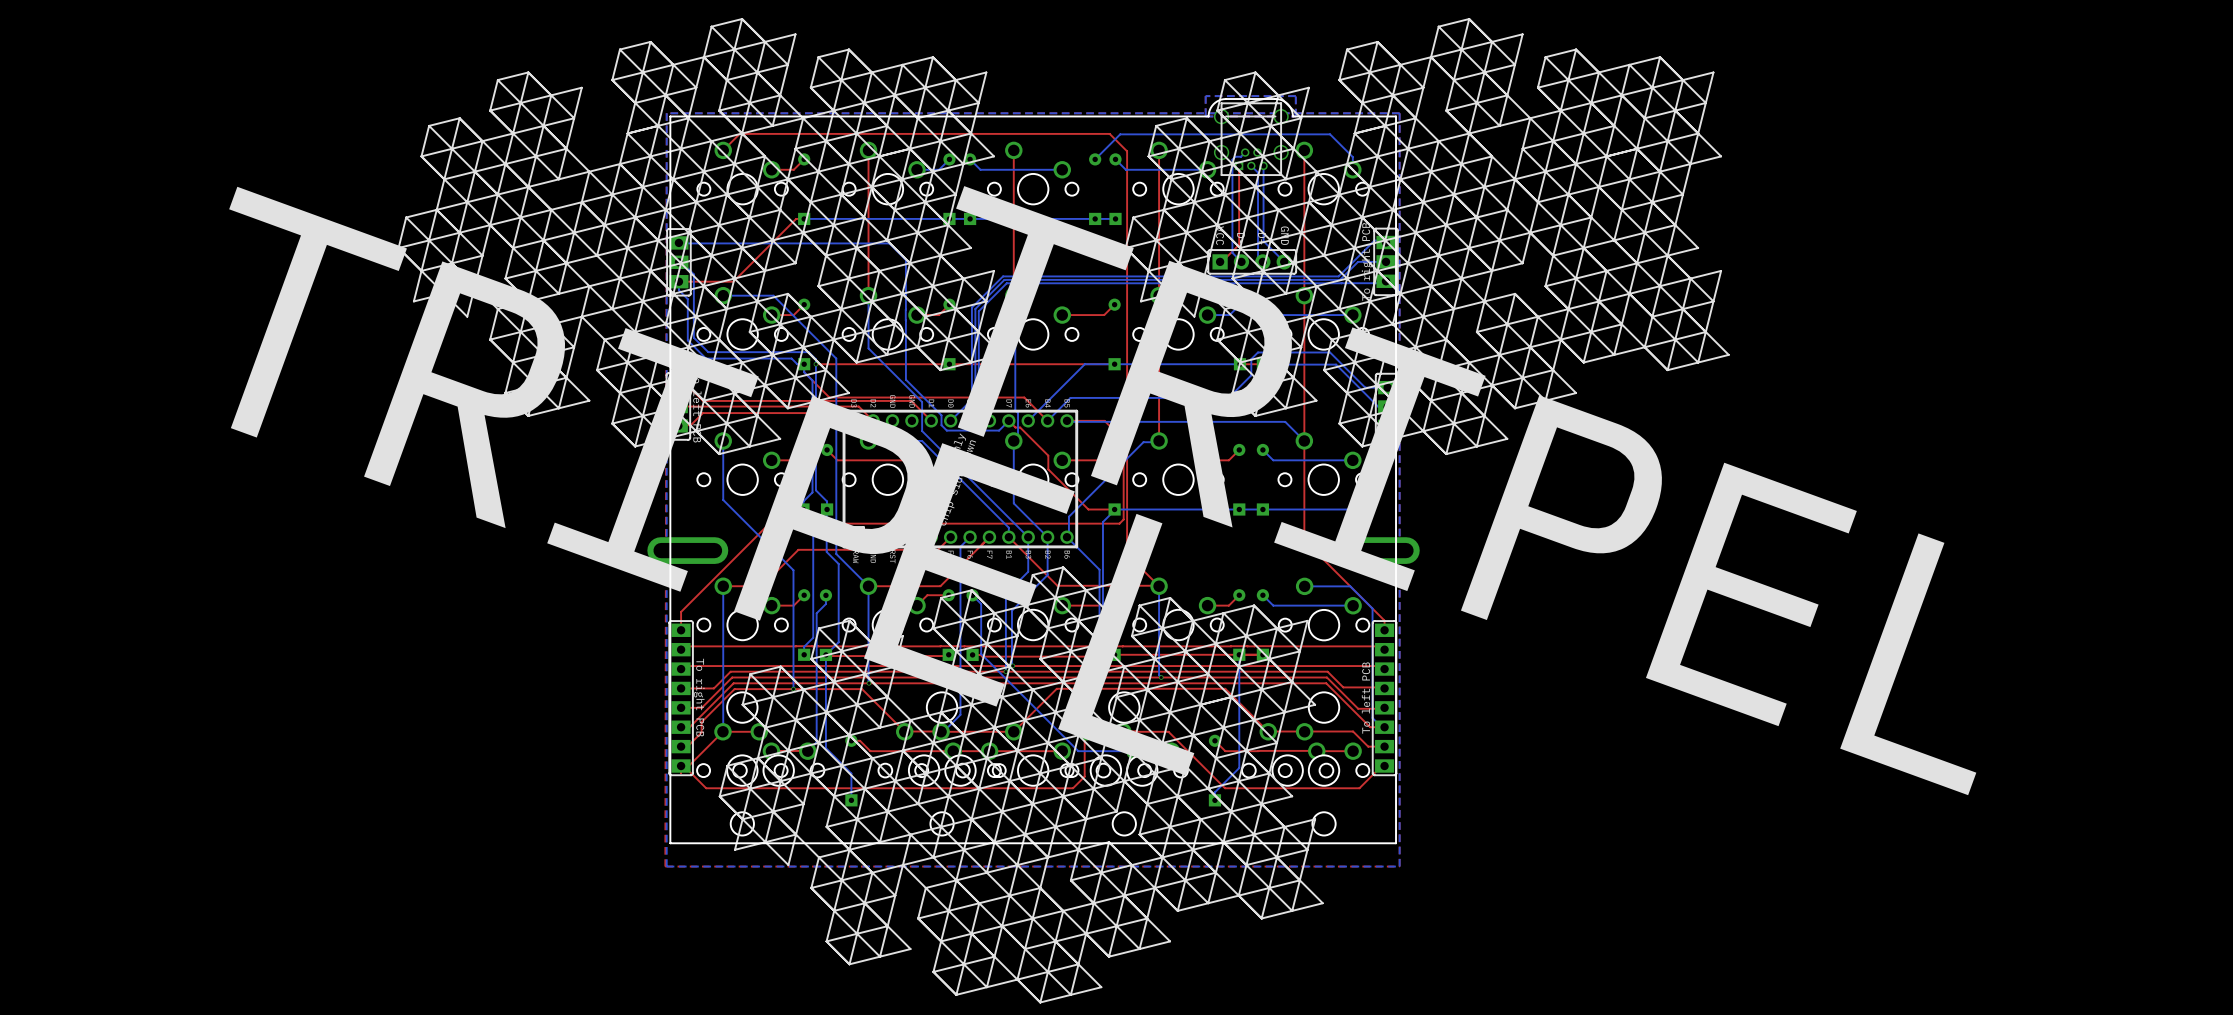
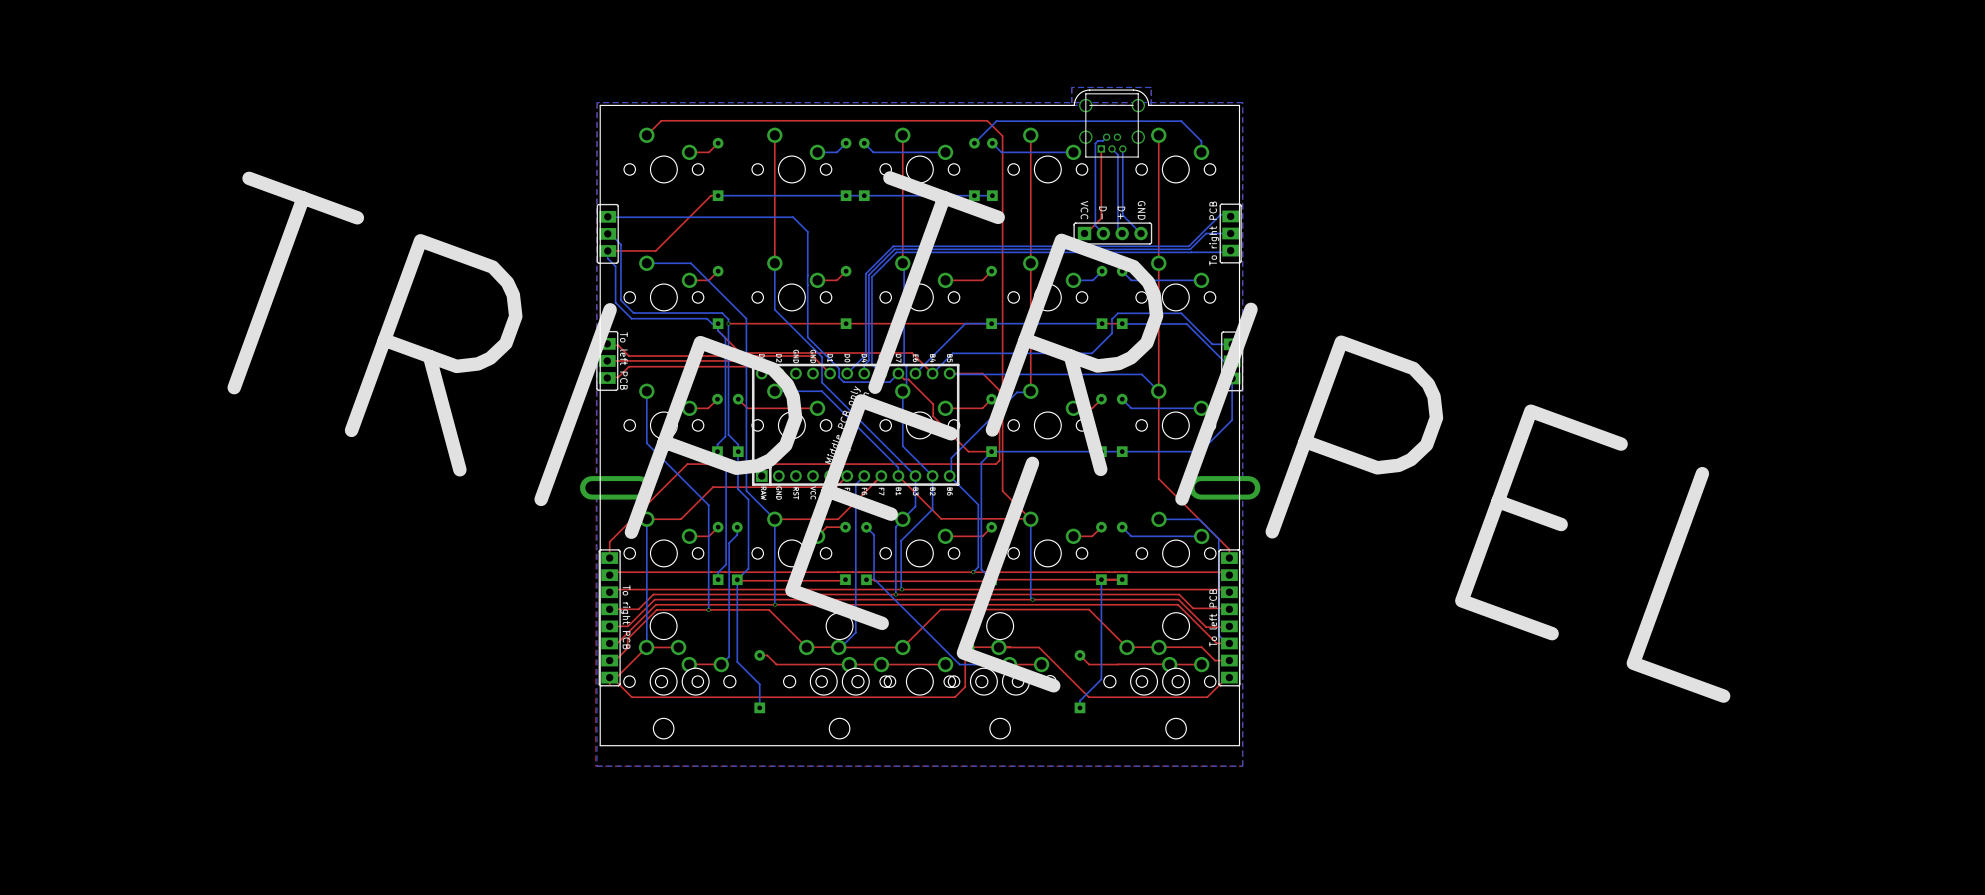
drawing: [398, 18, 1003, 455] -> none
drawing: [1125, 18, 1730, 455] -> none
drawing: [719, 566, 1324, 1003] -> none

